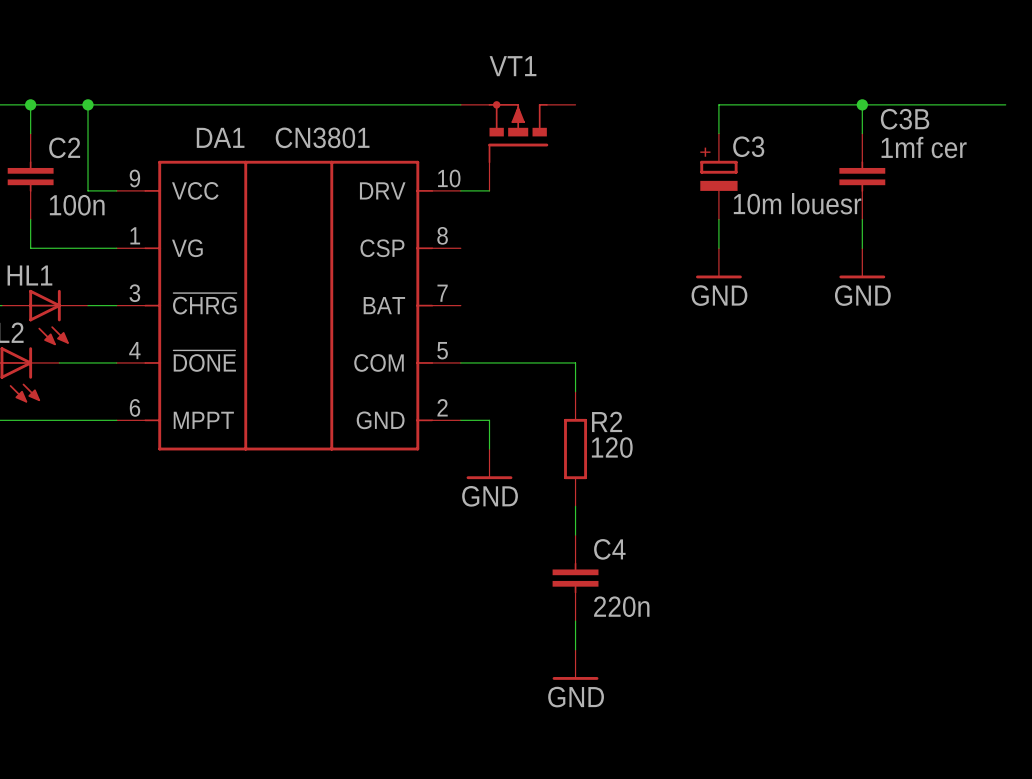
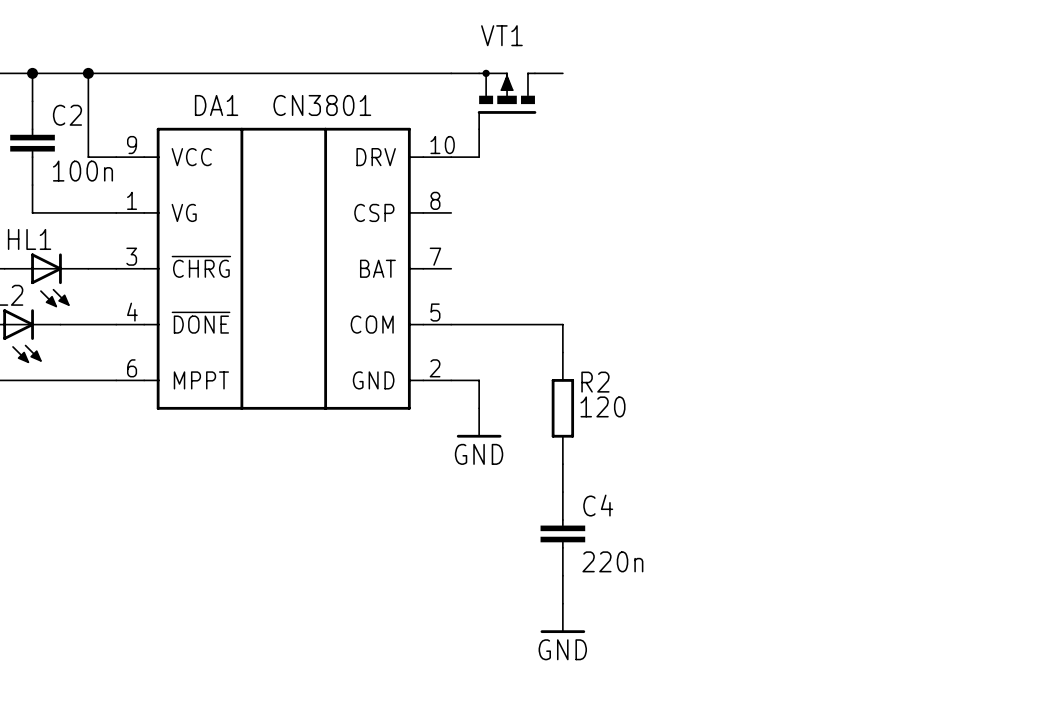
wire: (862, 104) (862, 133) -> none
junction: (862, 104) -> none
wire: (1005, 104) (718, 104) (718, 133) -> none
C3: 10m louesr (718, 176) -> none
C3B: 1mf cer (862, 176) -> none
wire: (718, 219) (718, 248) -> none
wire: (862, 219) (862, 248) -> none
power symbol: GND (718, 263) -> none
power symbol: GND (862, 263) -> none

